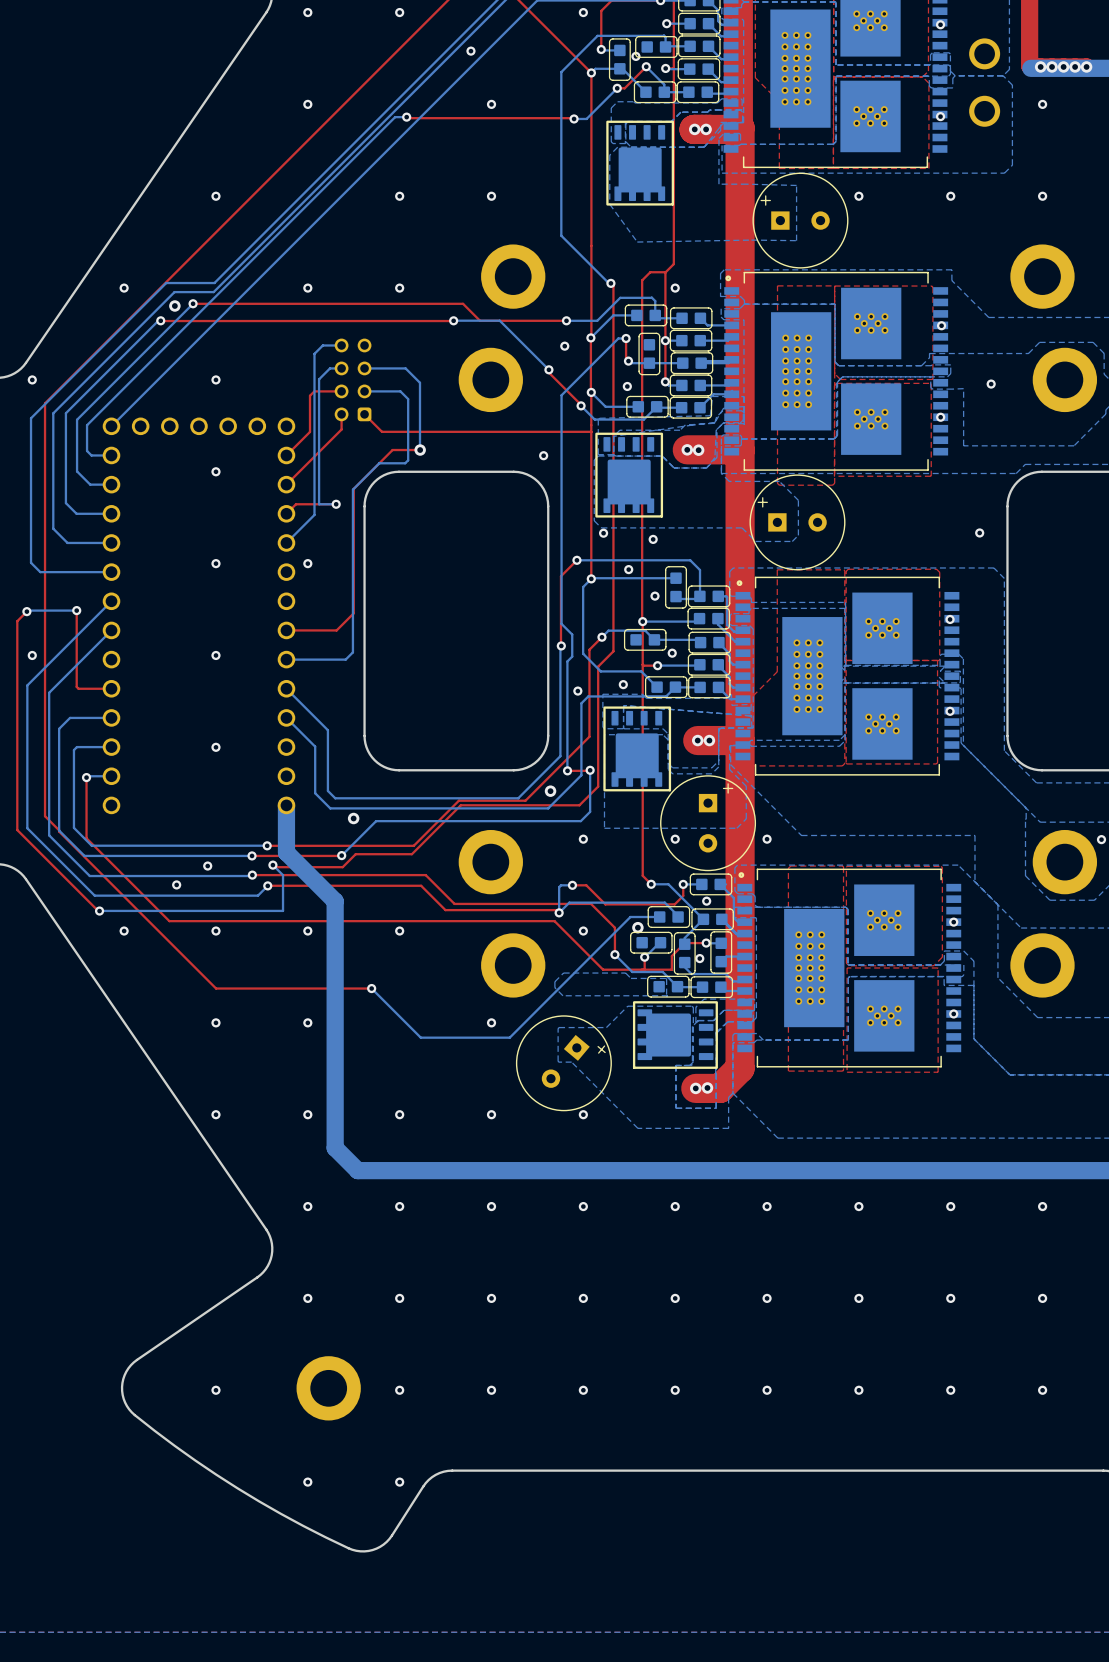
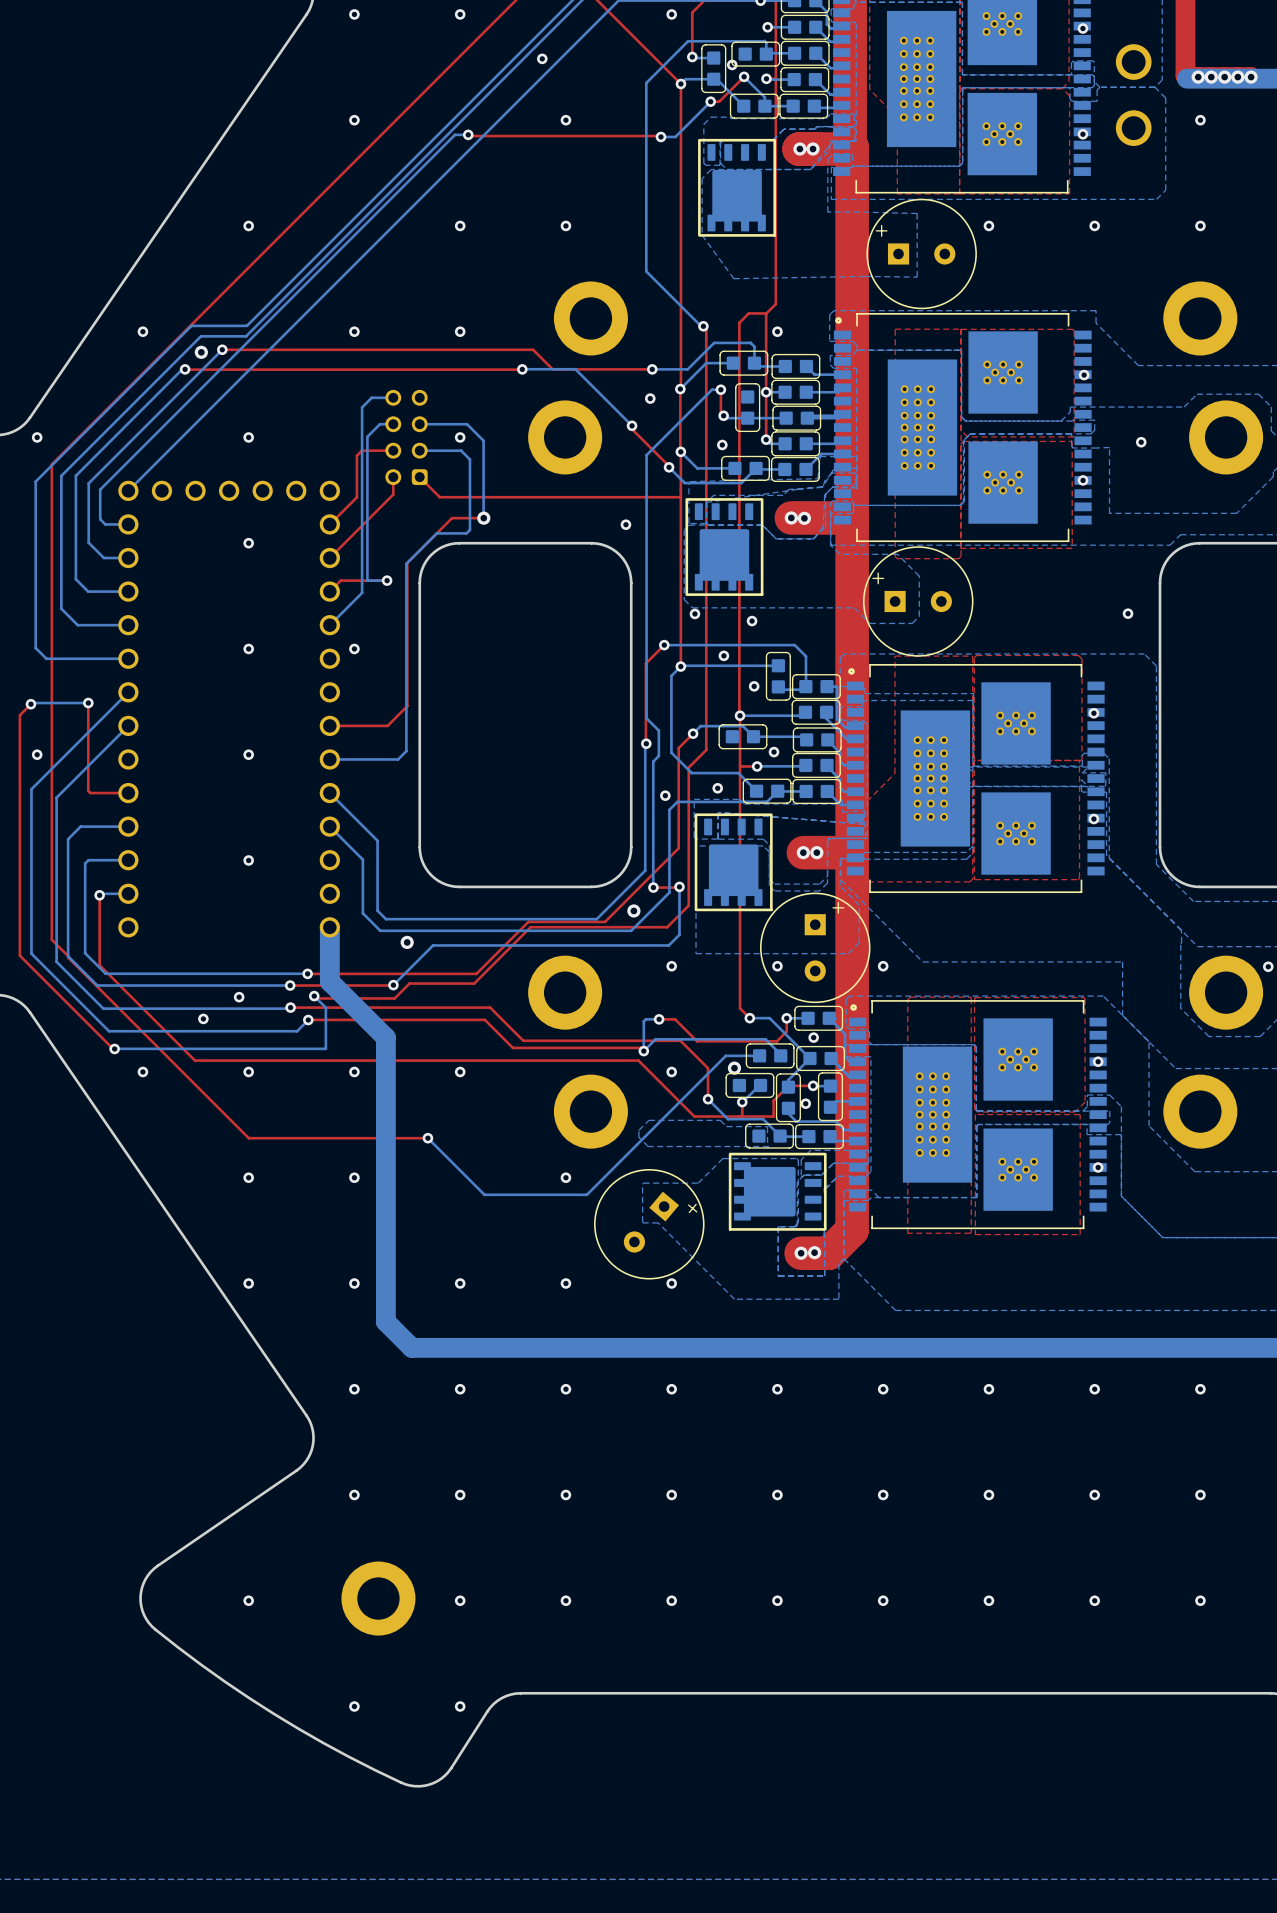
via: none -> (460, 437)

